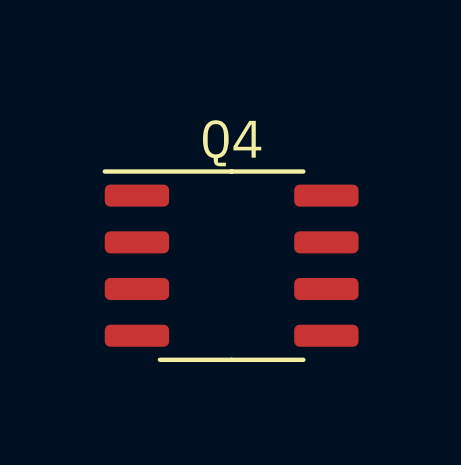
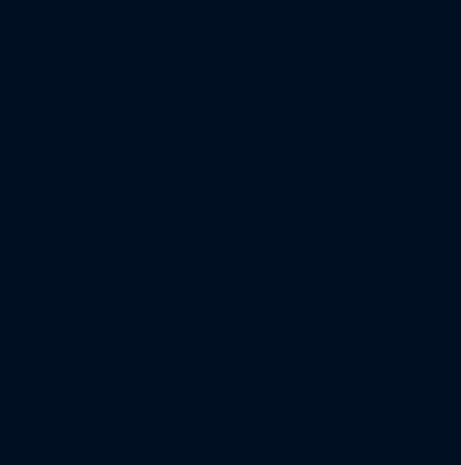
Q4: (230, 265) -> none

